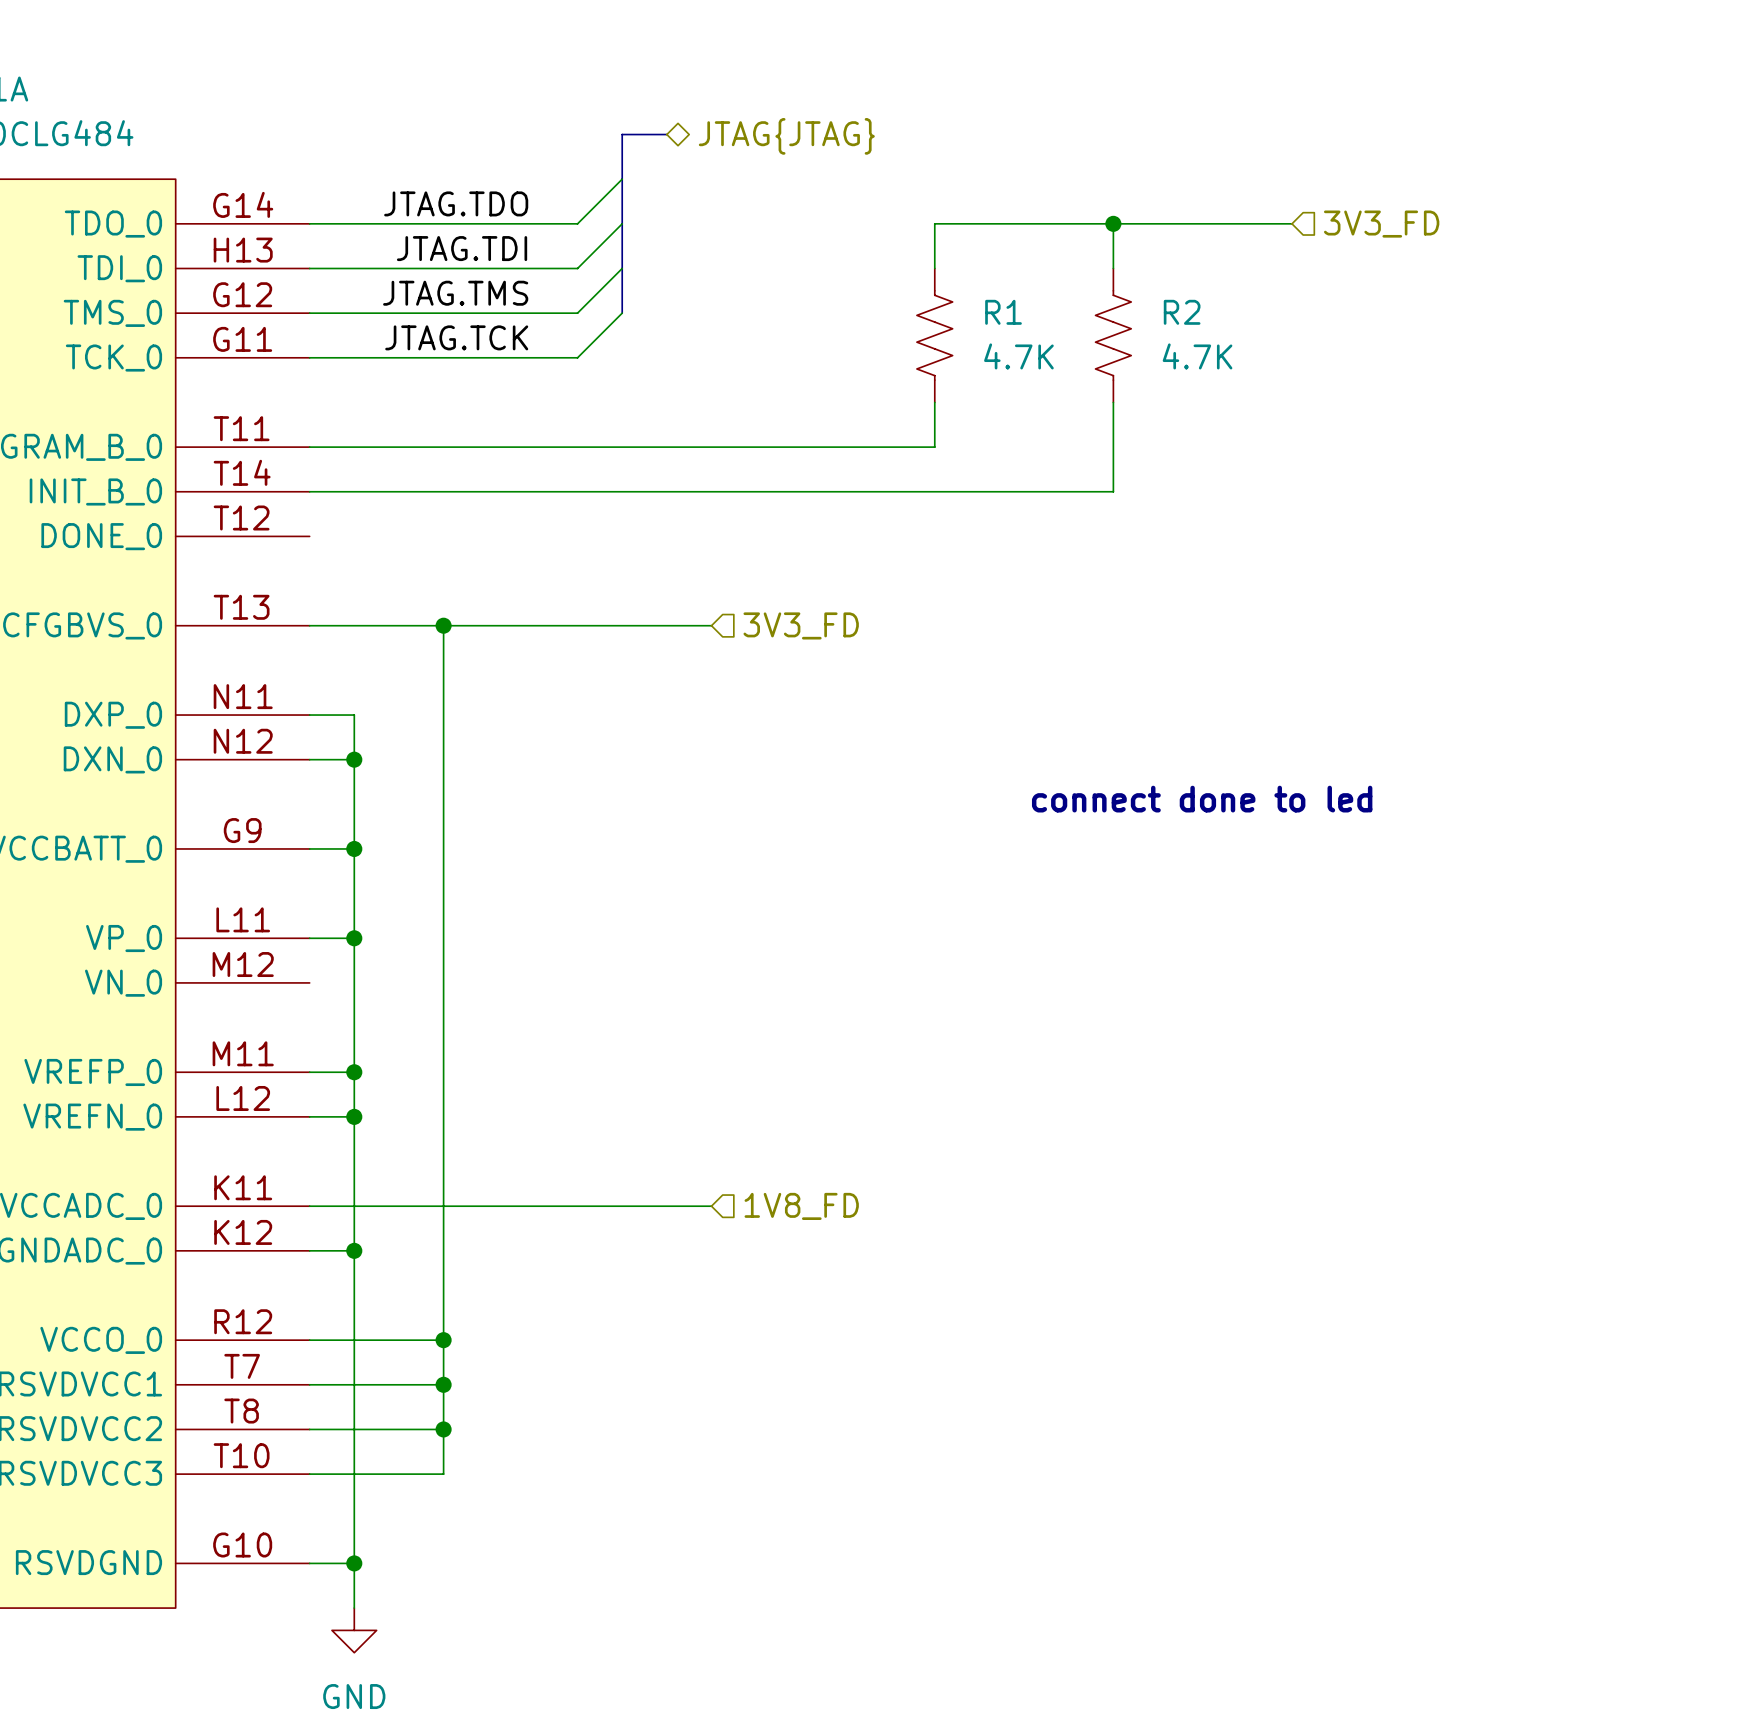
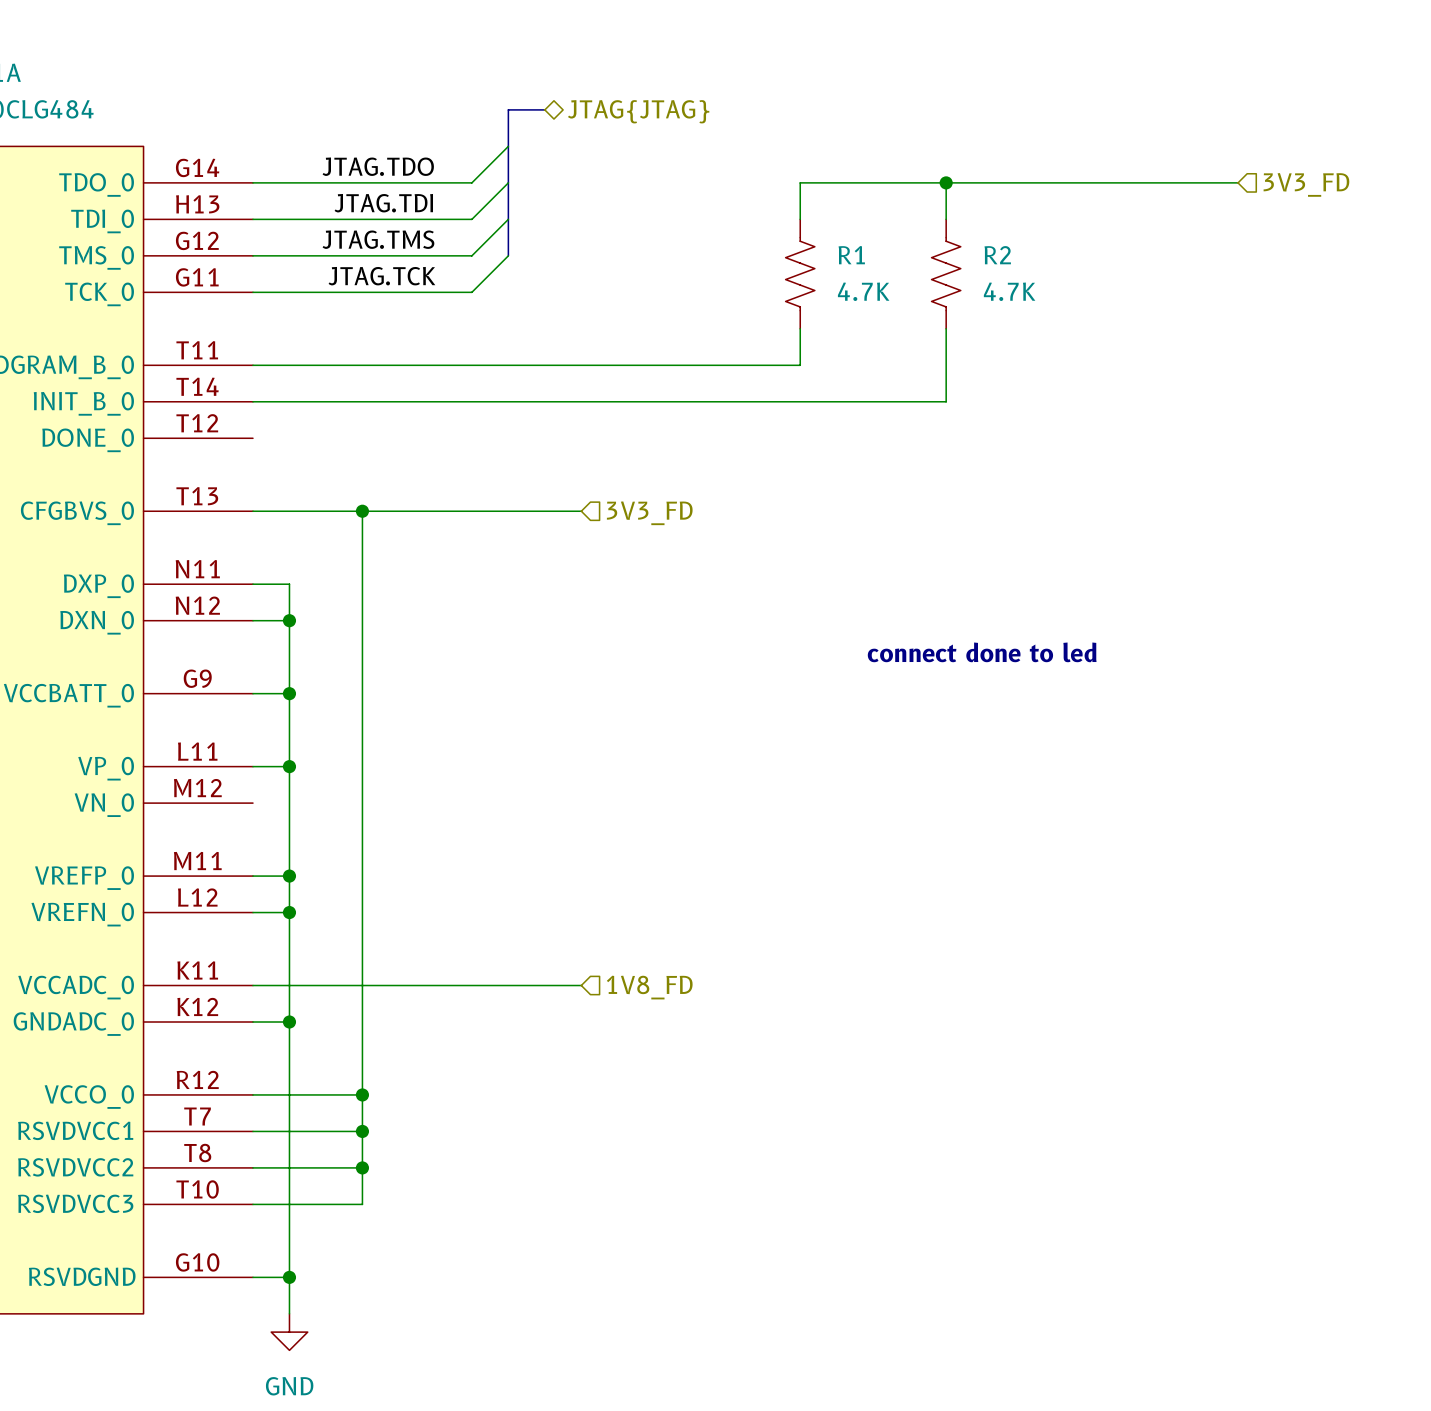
wire: (979, 223) (934, 223) (934, 268) -> (800, 182) (800, 219)
wire: (1113, 223) (1113, 268) -> (946, 182) (946, 219)
junction position: (1113, 223) -> (946, 182)
wire: none -> (1055, 182) (1238, 182)
hierarchical label position: 3V3_FD (1381, 224) -> 3V3_FD (1306, 184)
R1 position: (934, 335) -> (800, 274)
R2 position: (1113, 335) -> (946, 274)
wire: (934, 402) (934, 447) -> (800, 328) (800, 365) (763, 365)
wire: (1113, 402) (1113, 491) -> (946, 328) (946, 401) (909, 401)

